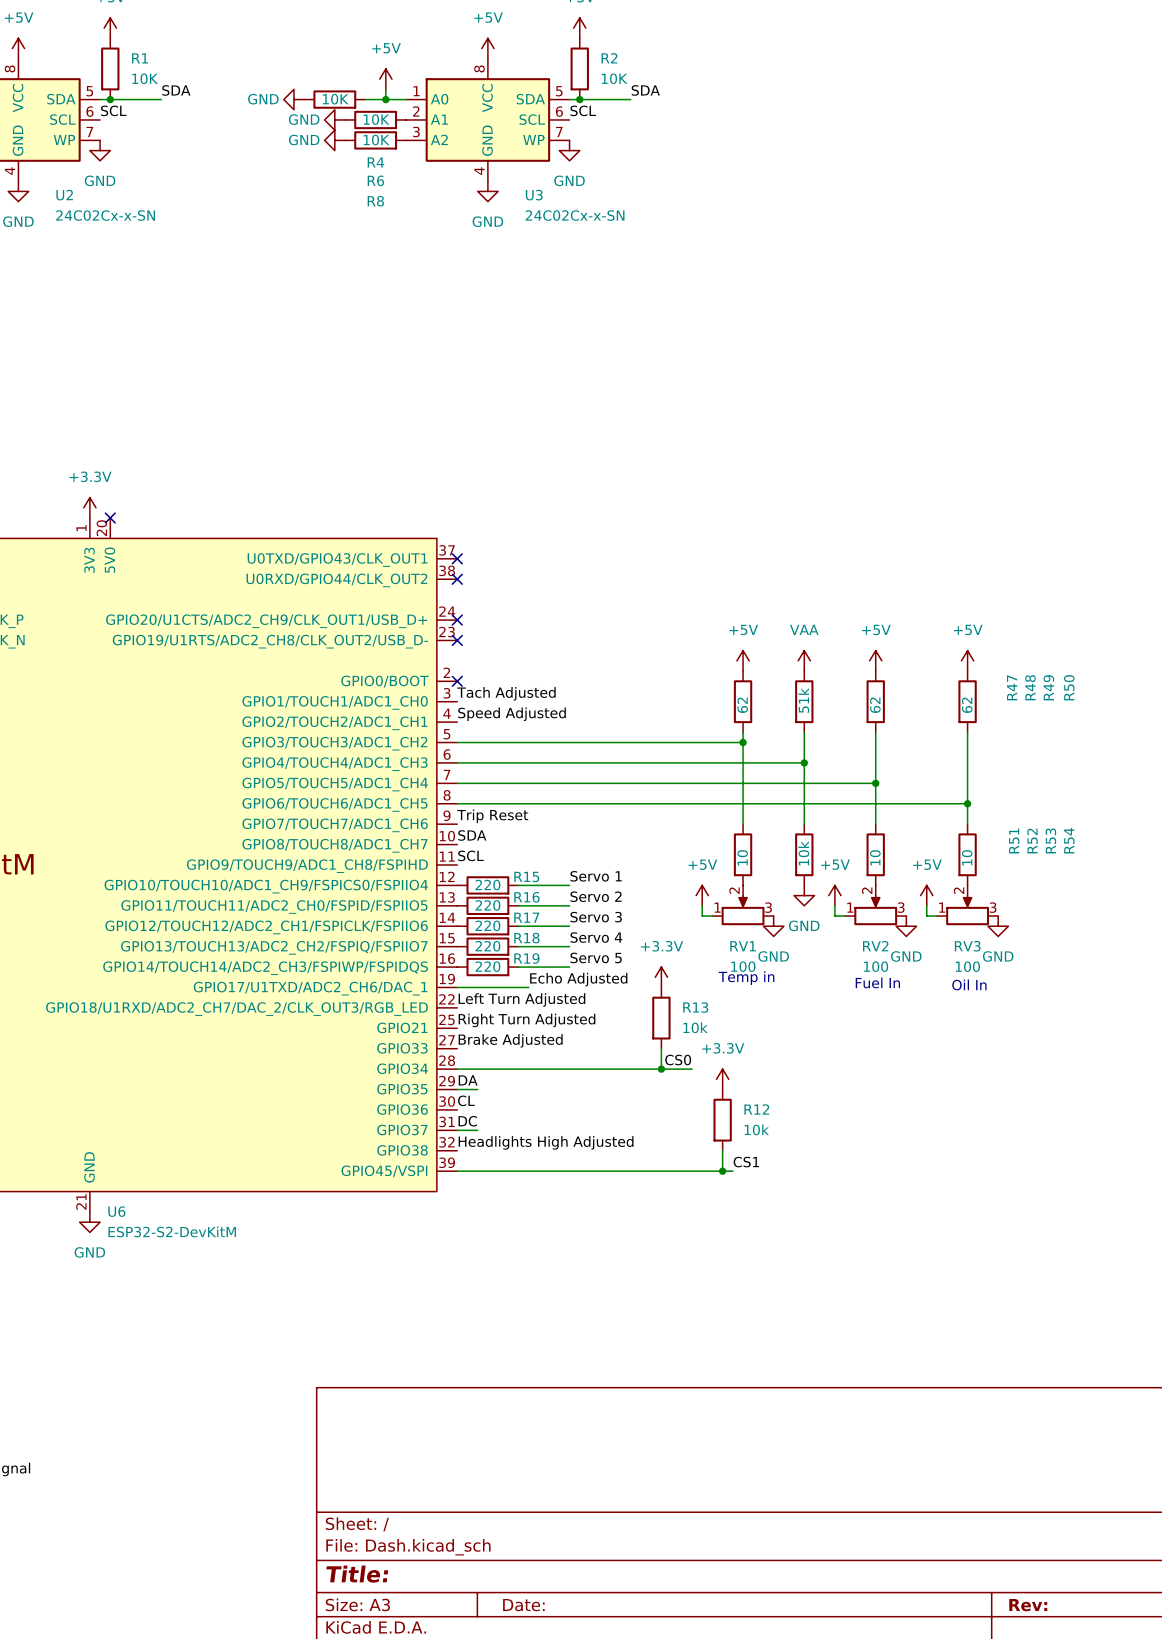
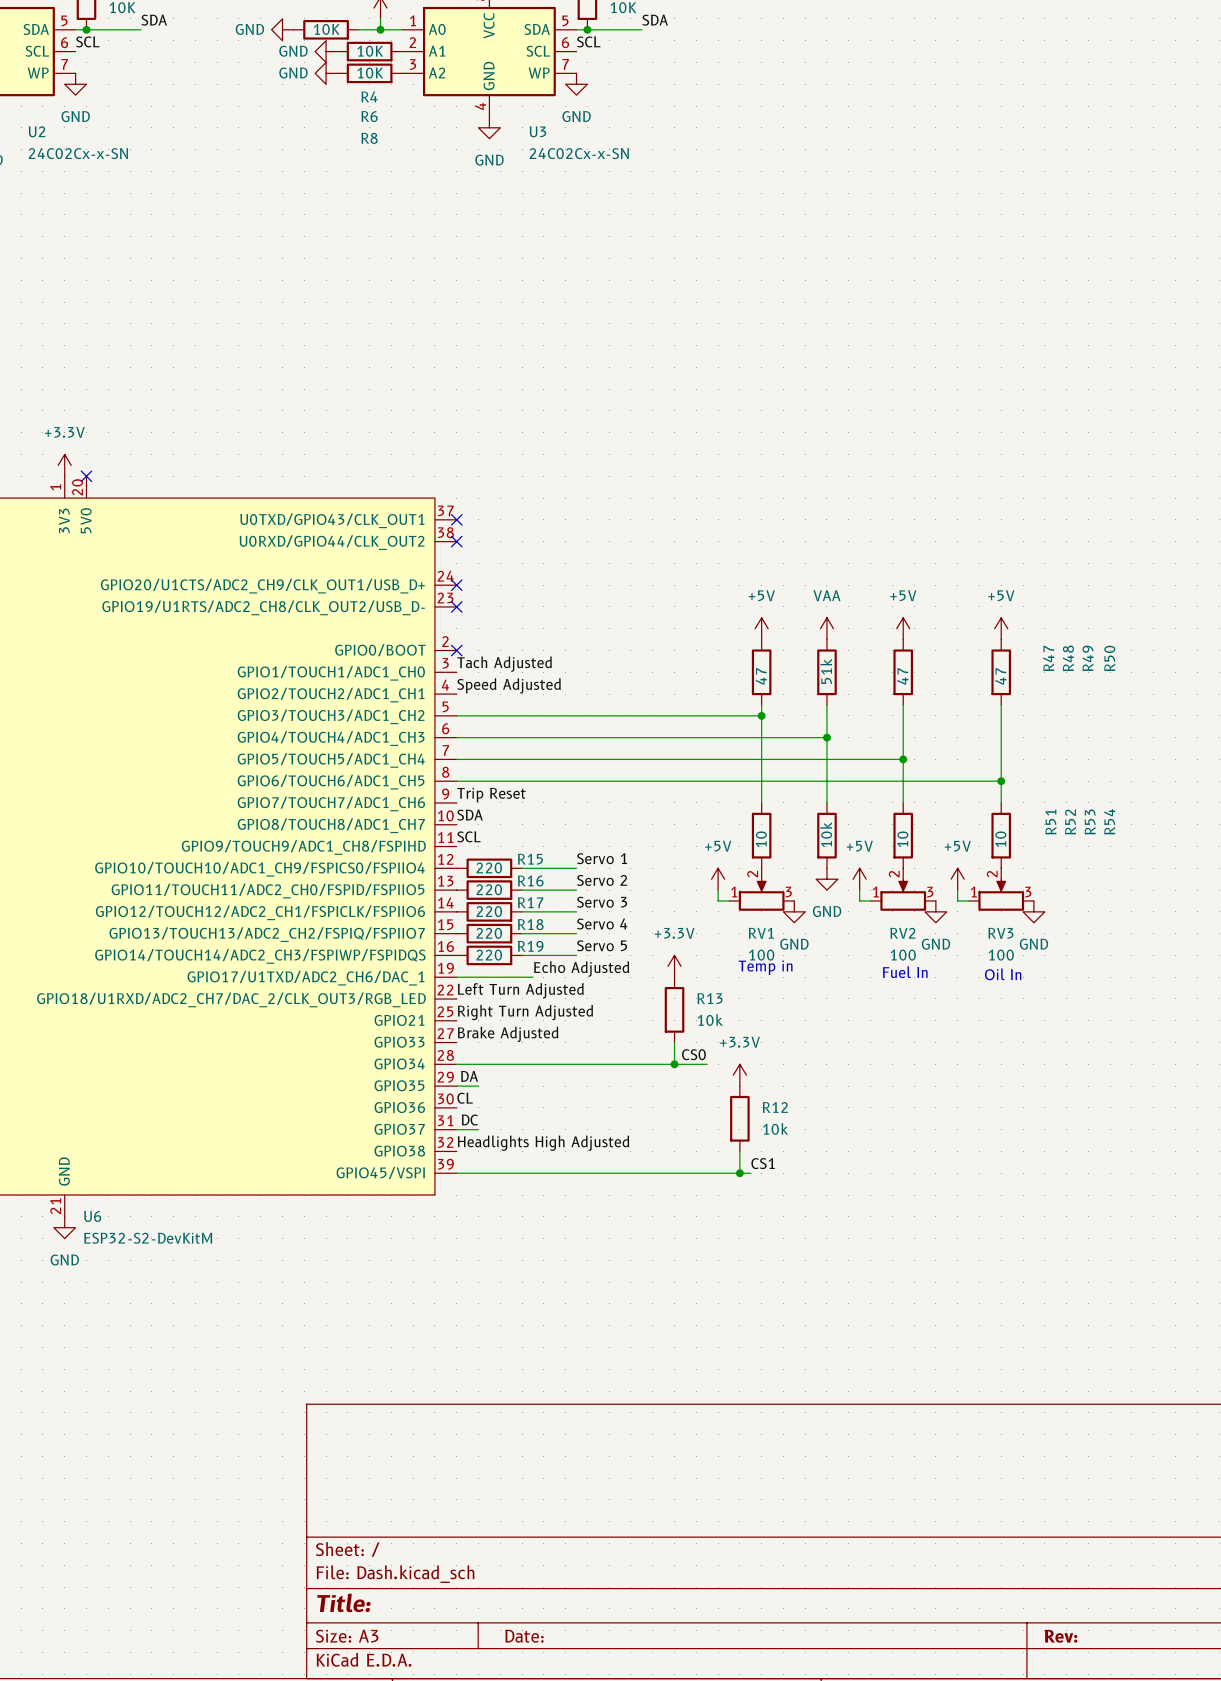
R47 value: 62 (742, 705) -> 47 (761, 676)
R49 value: 62 (875, 705) -> 47 (902, 676)
R50 value: 62 (967, 705) -> 47 (1000, 676)

